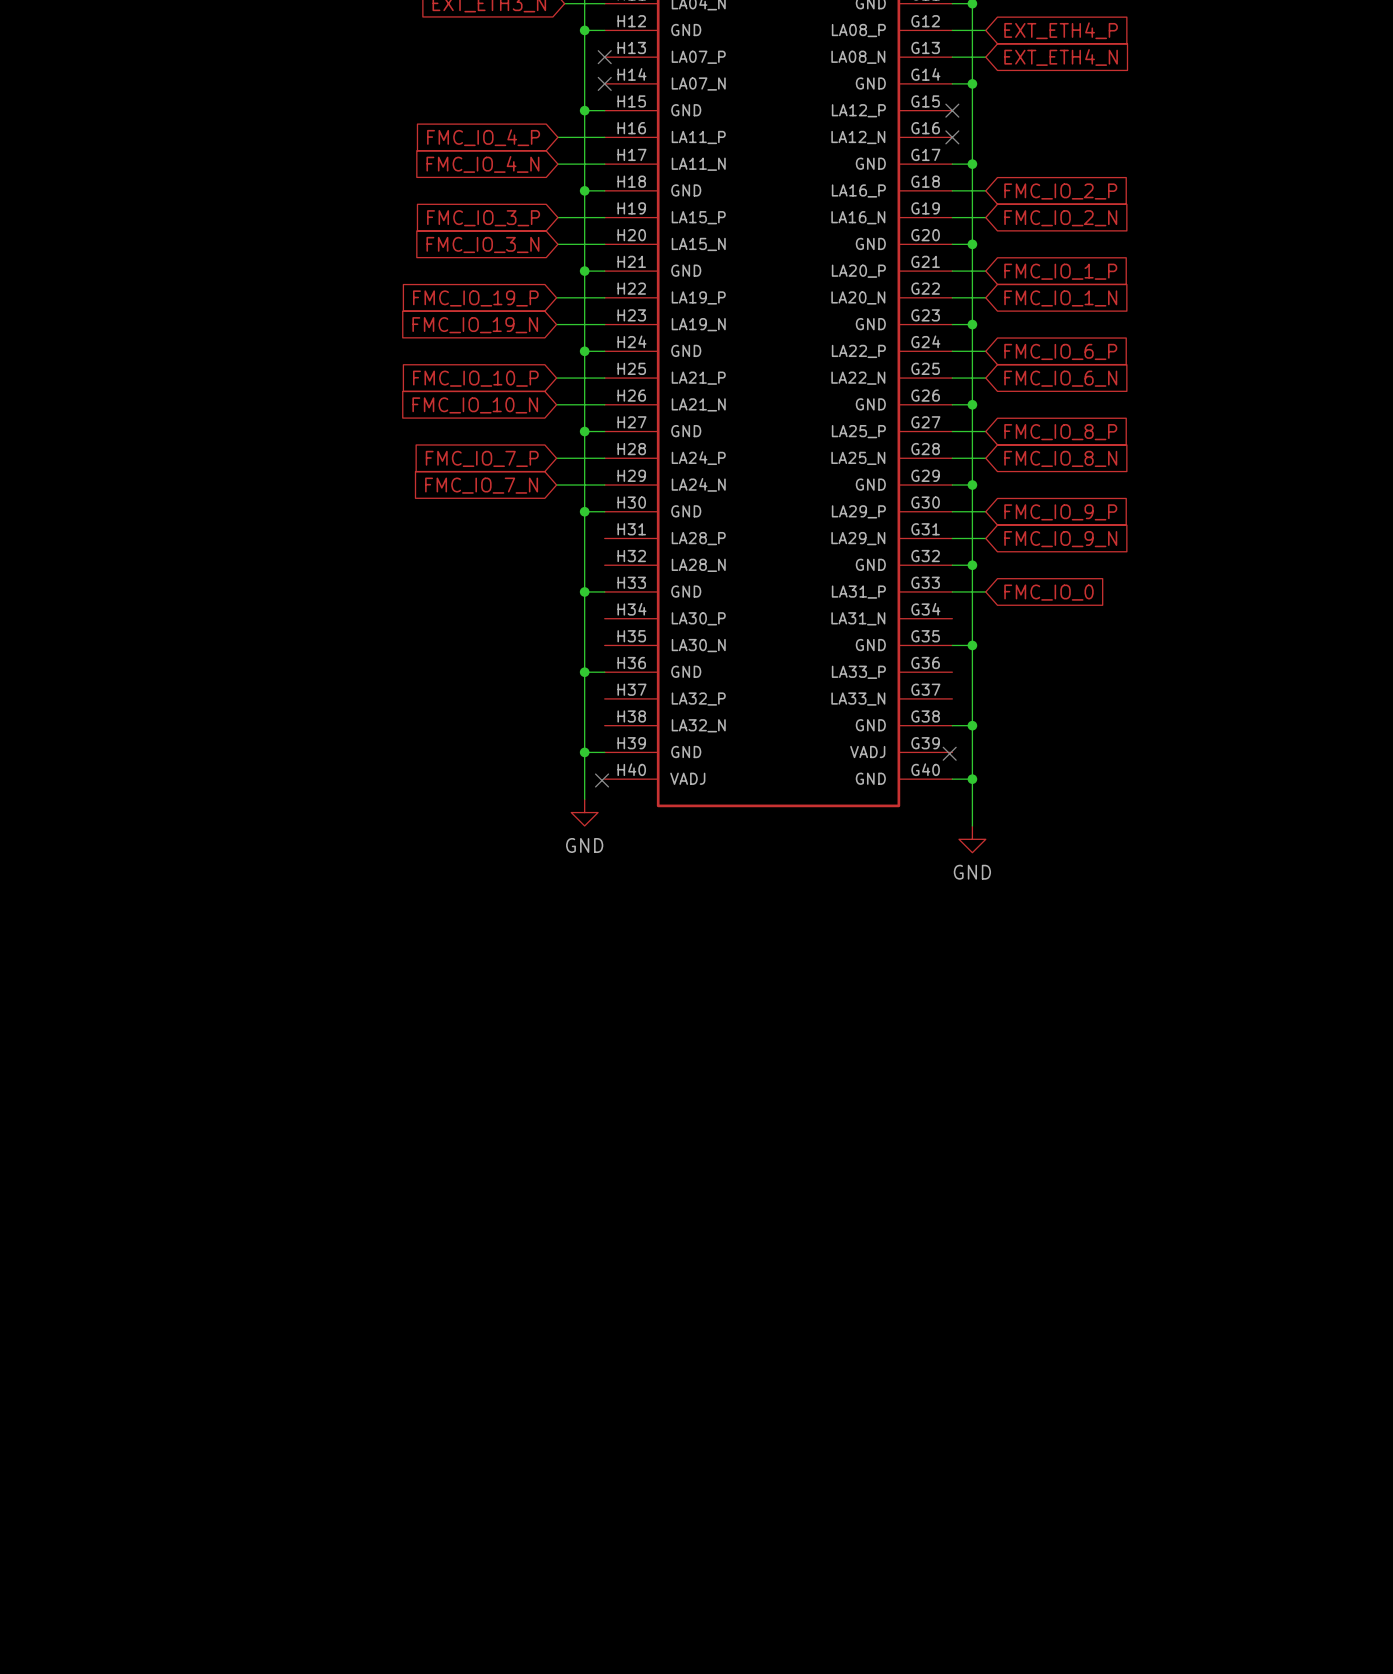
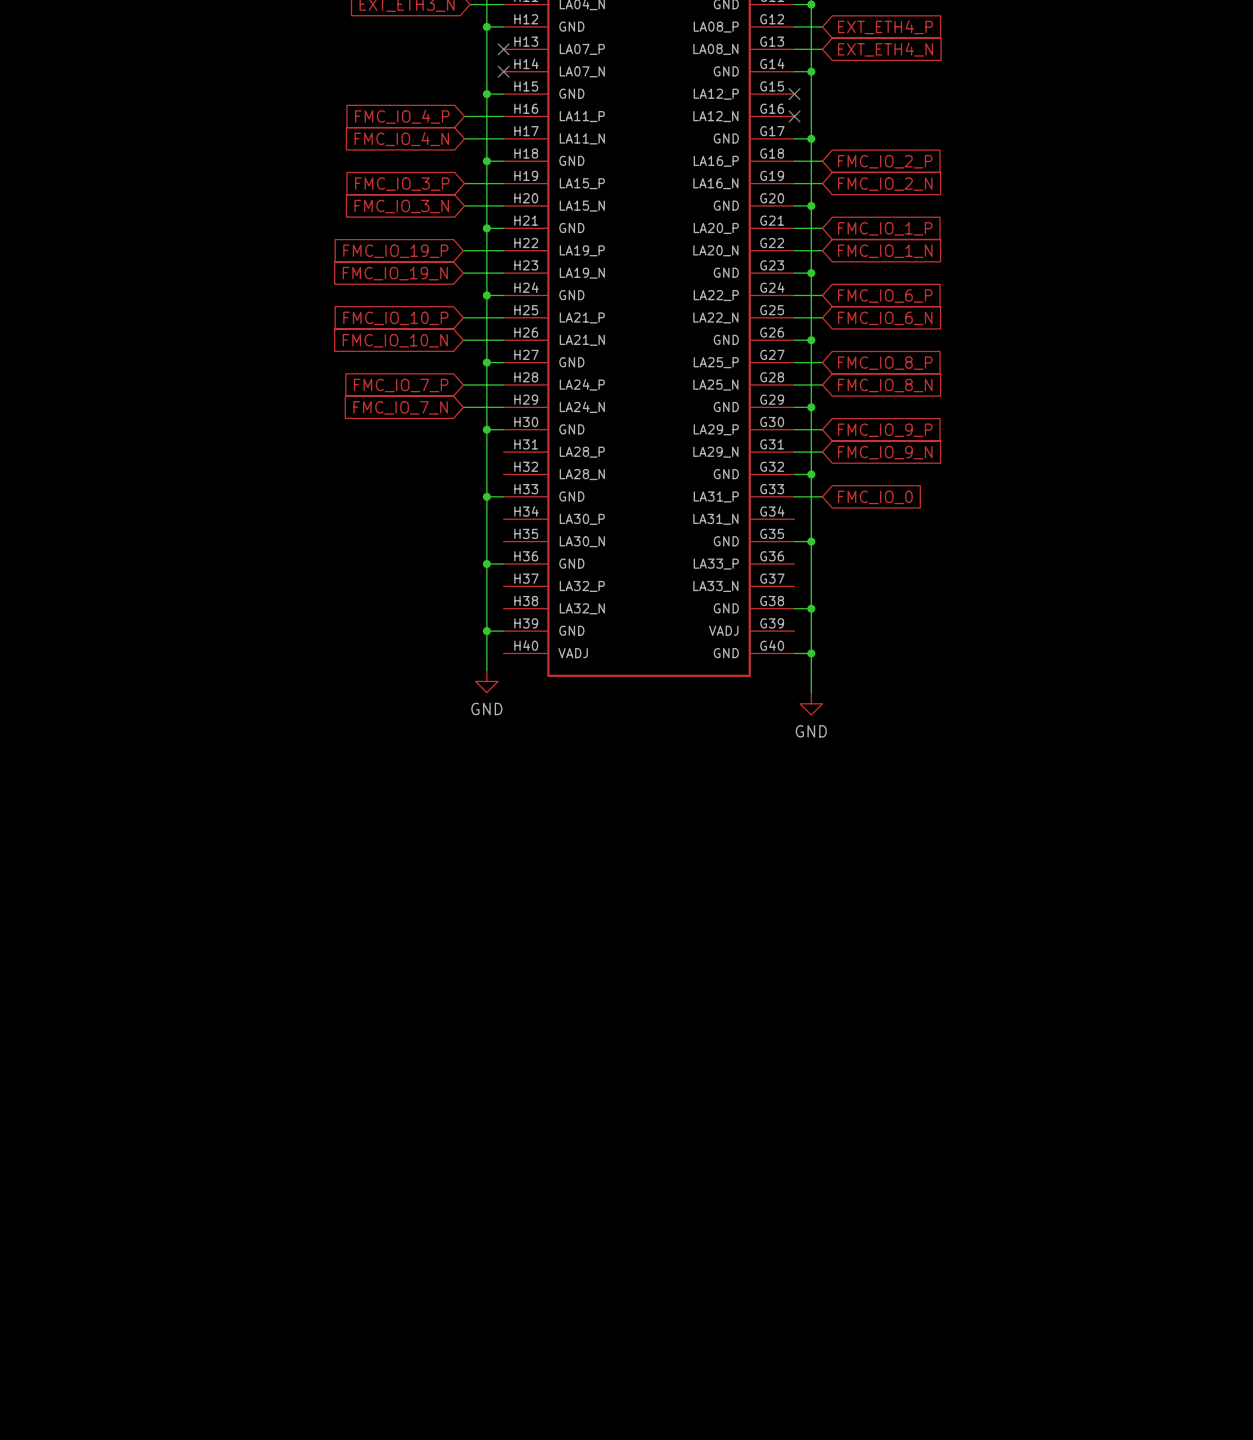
no-connect mark: (949, 753) -> none
no-connect mark: (602, 780) -> none

